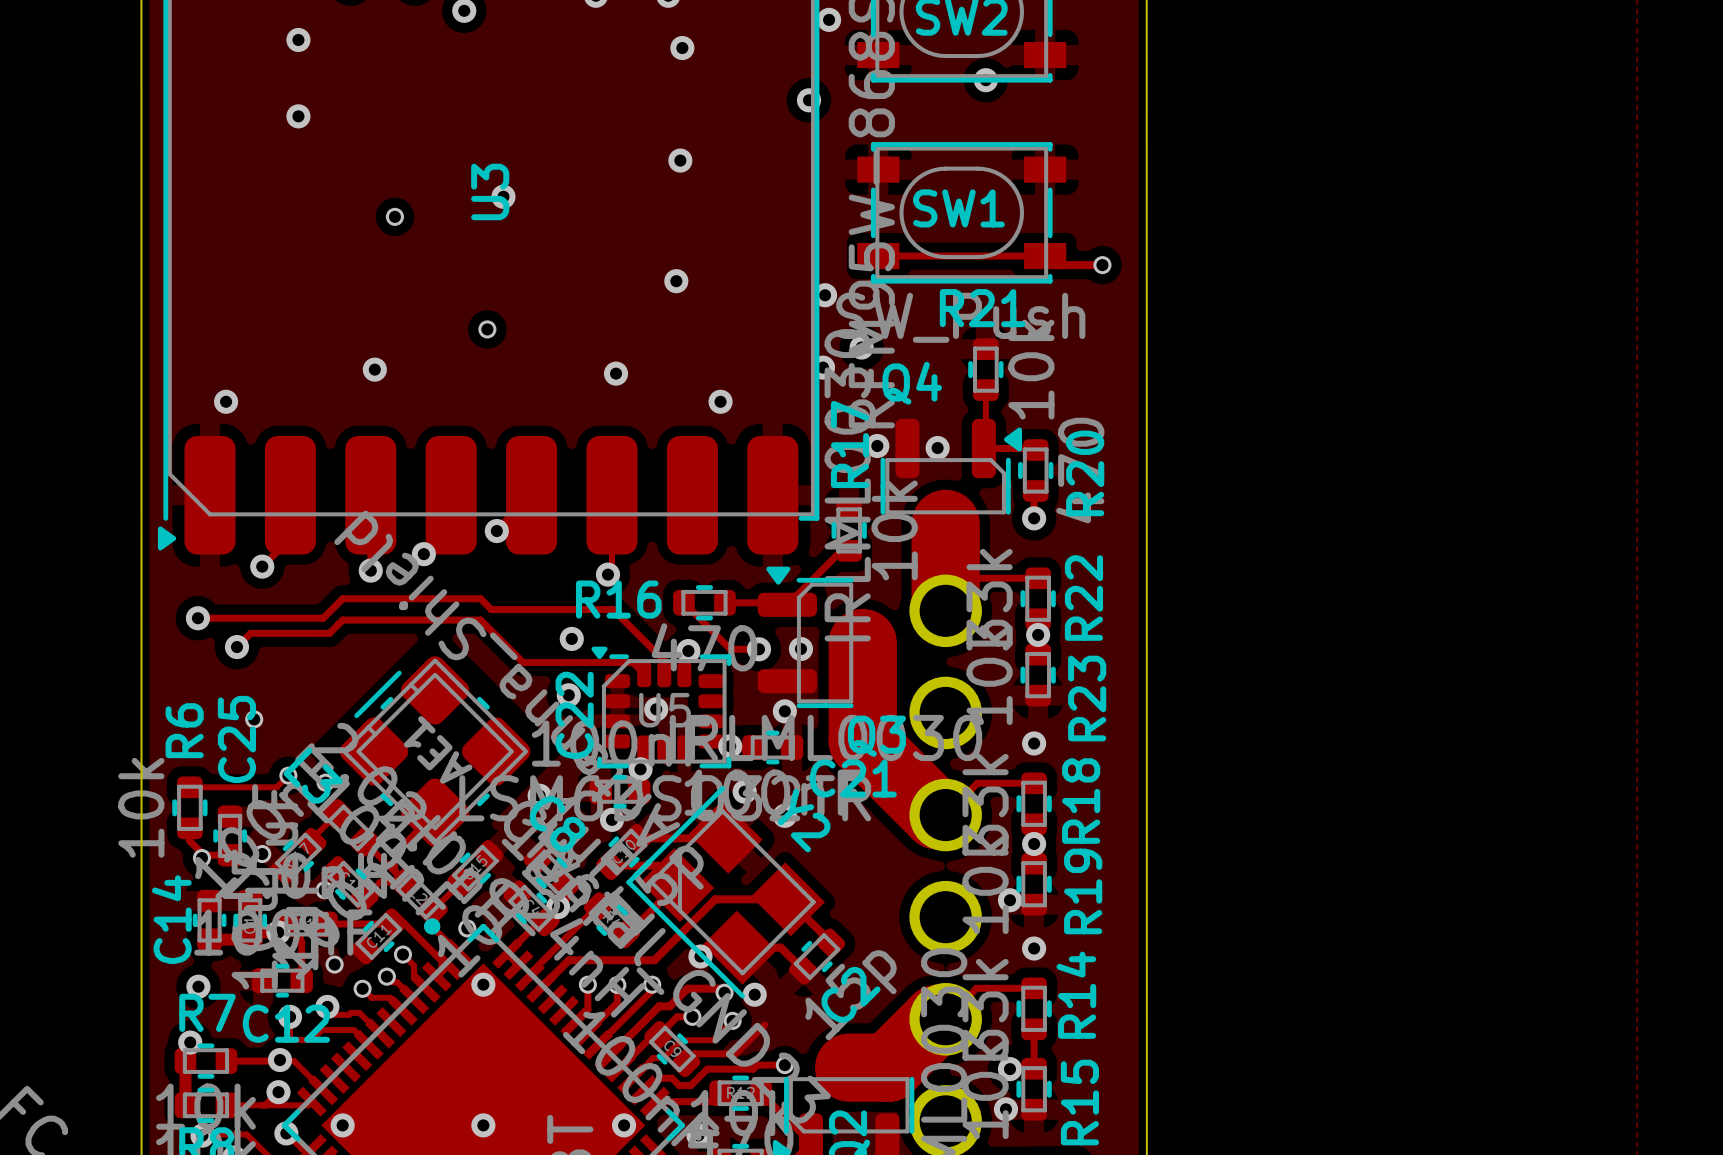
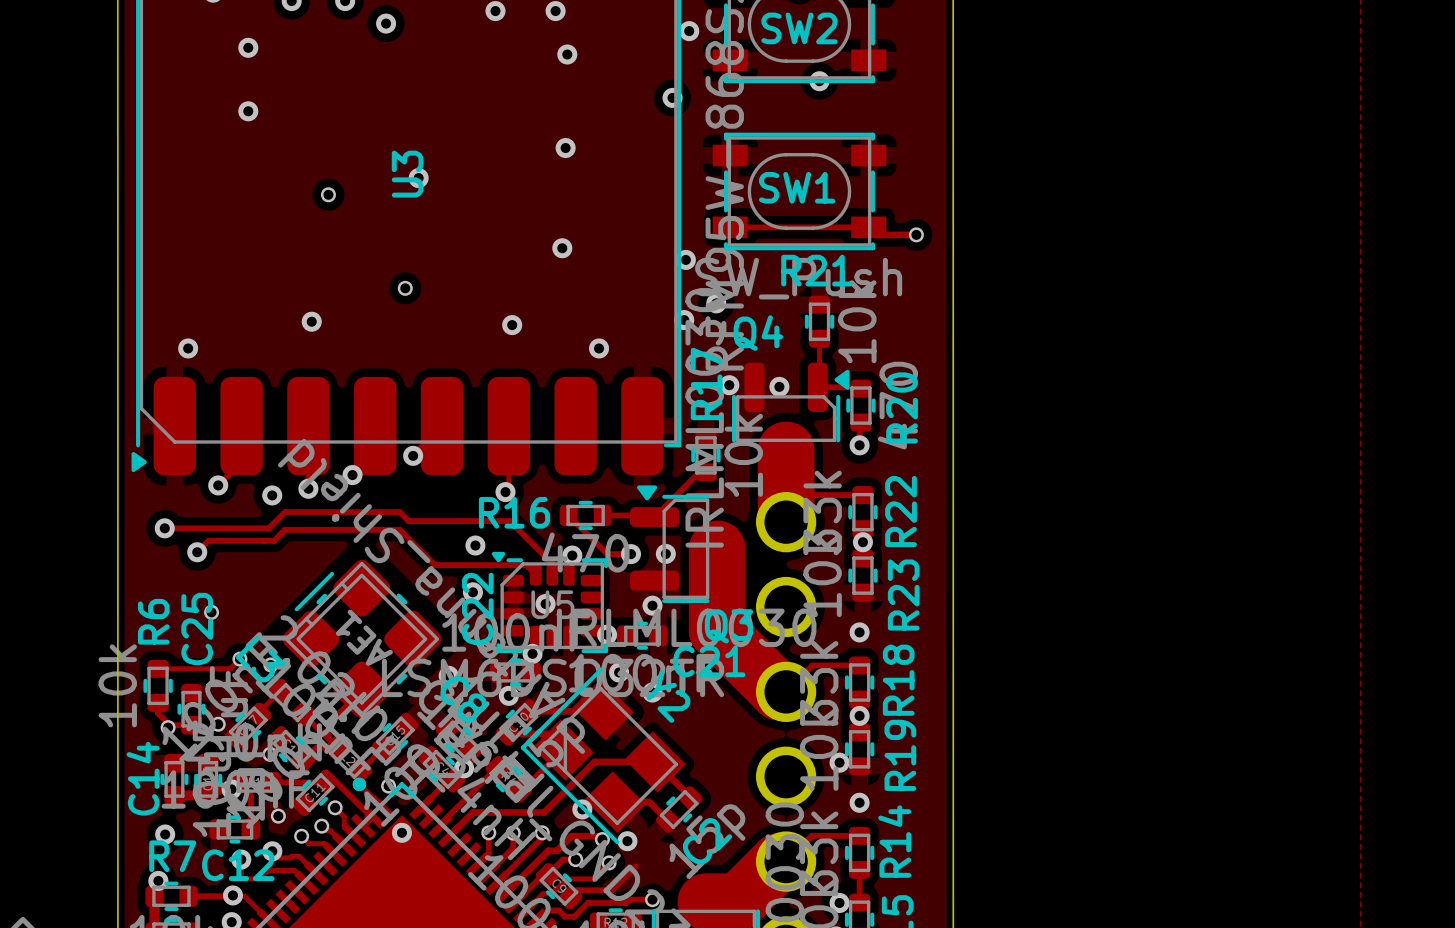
via: none -> (272, 495)

